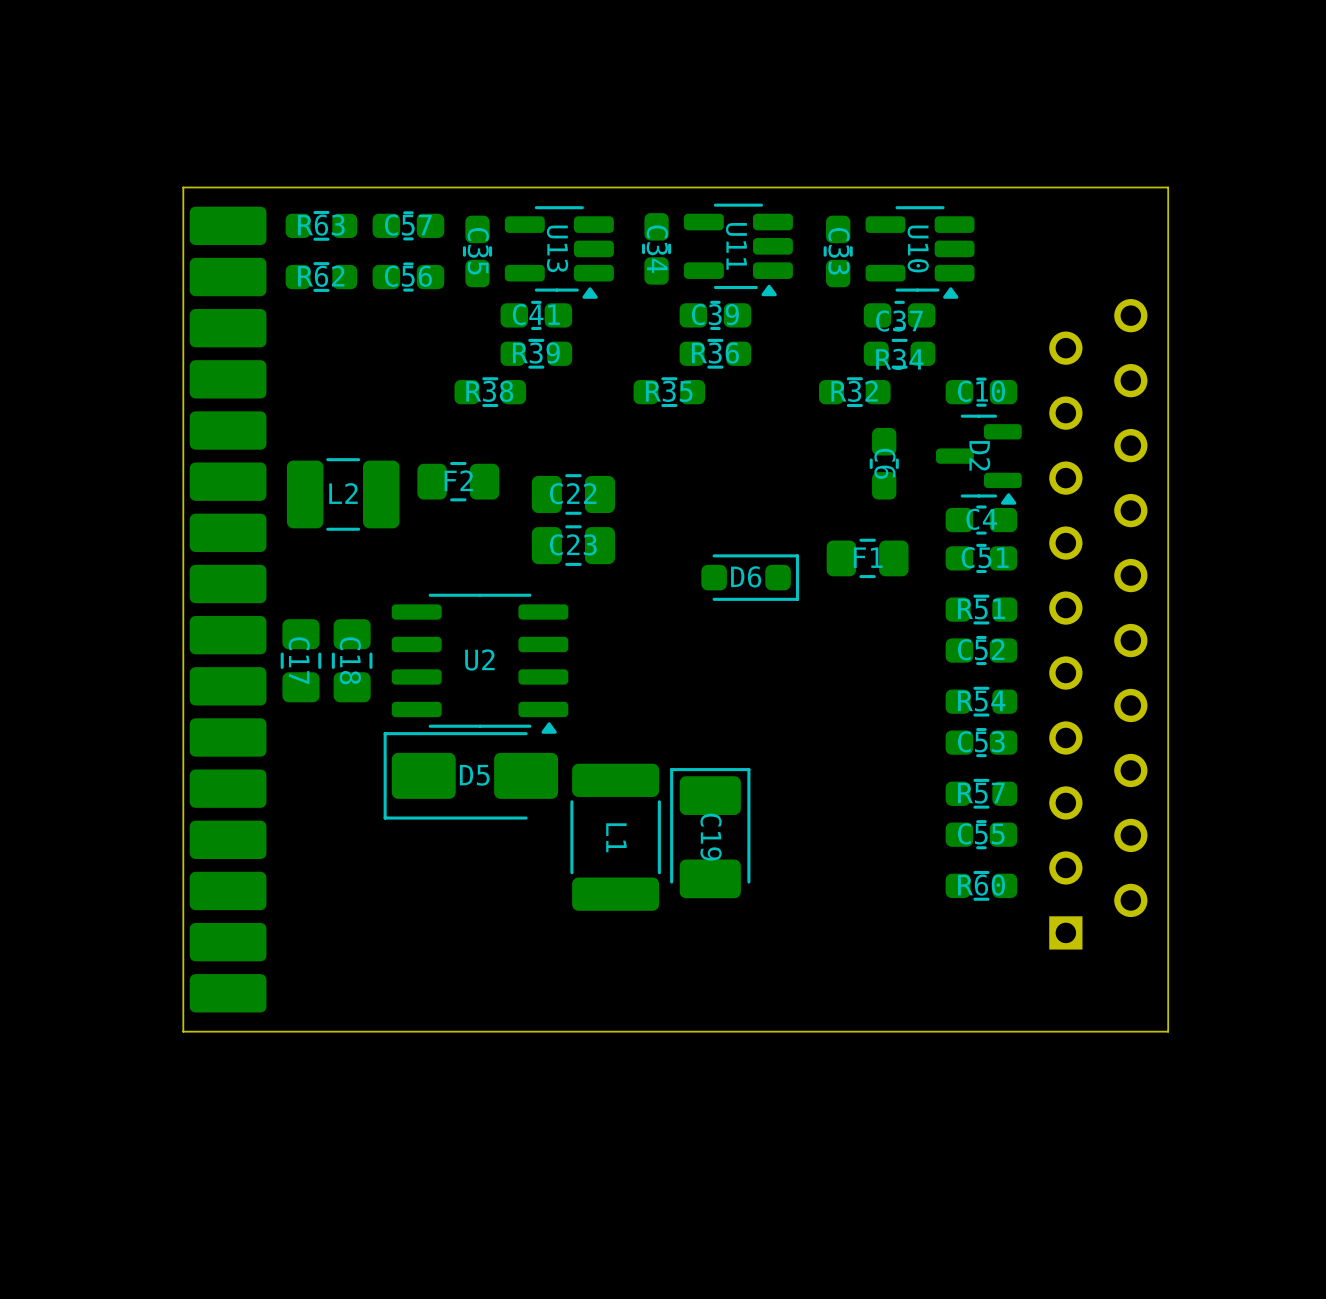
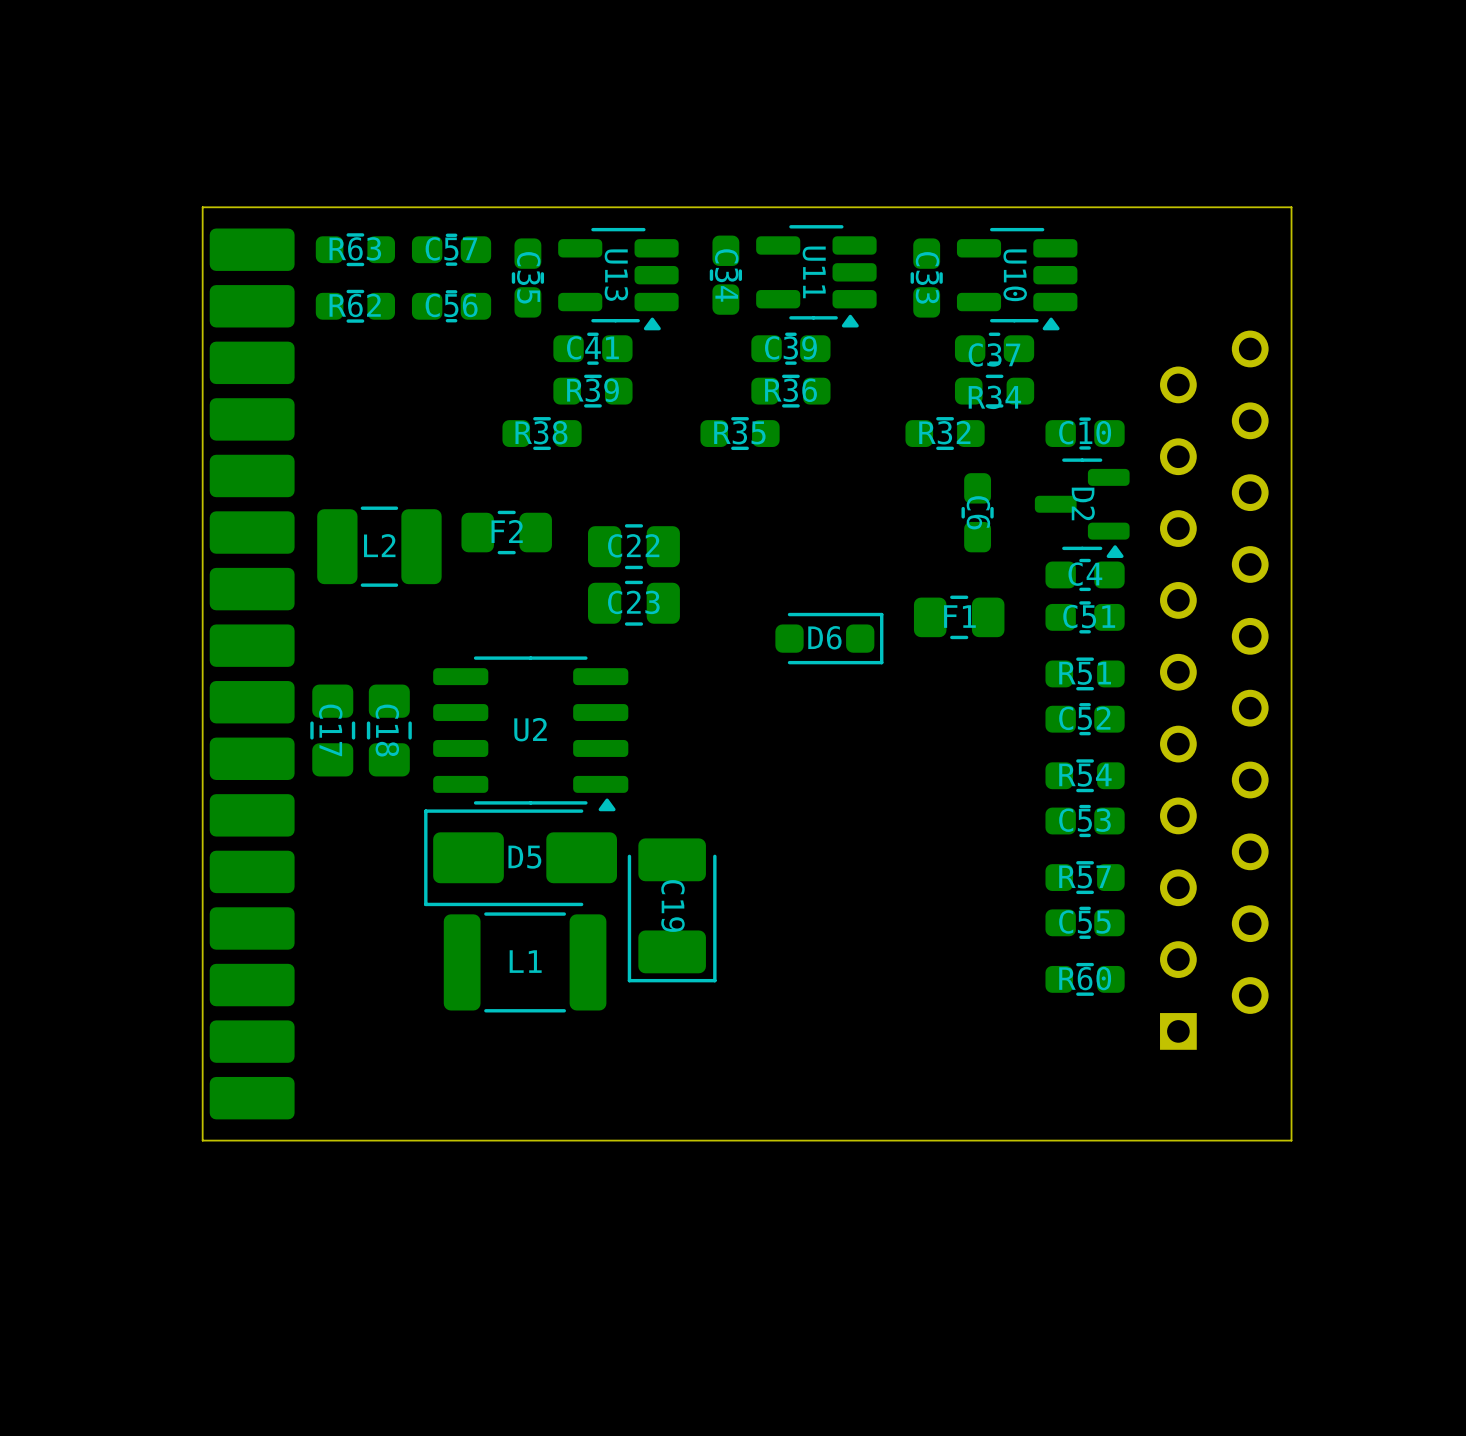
C19 rotation: 0° (710, 833) -> 180° (672, 910)
C19 position: (710, 833) -> (672, 910)
L1 rotation: 0° (615, 837) -> 90° clockwise (525, 962)
L1 position: (615, 837) -> (525, 962)

